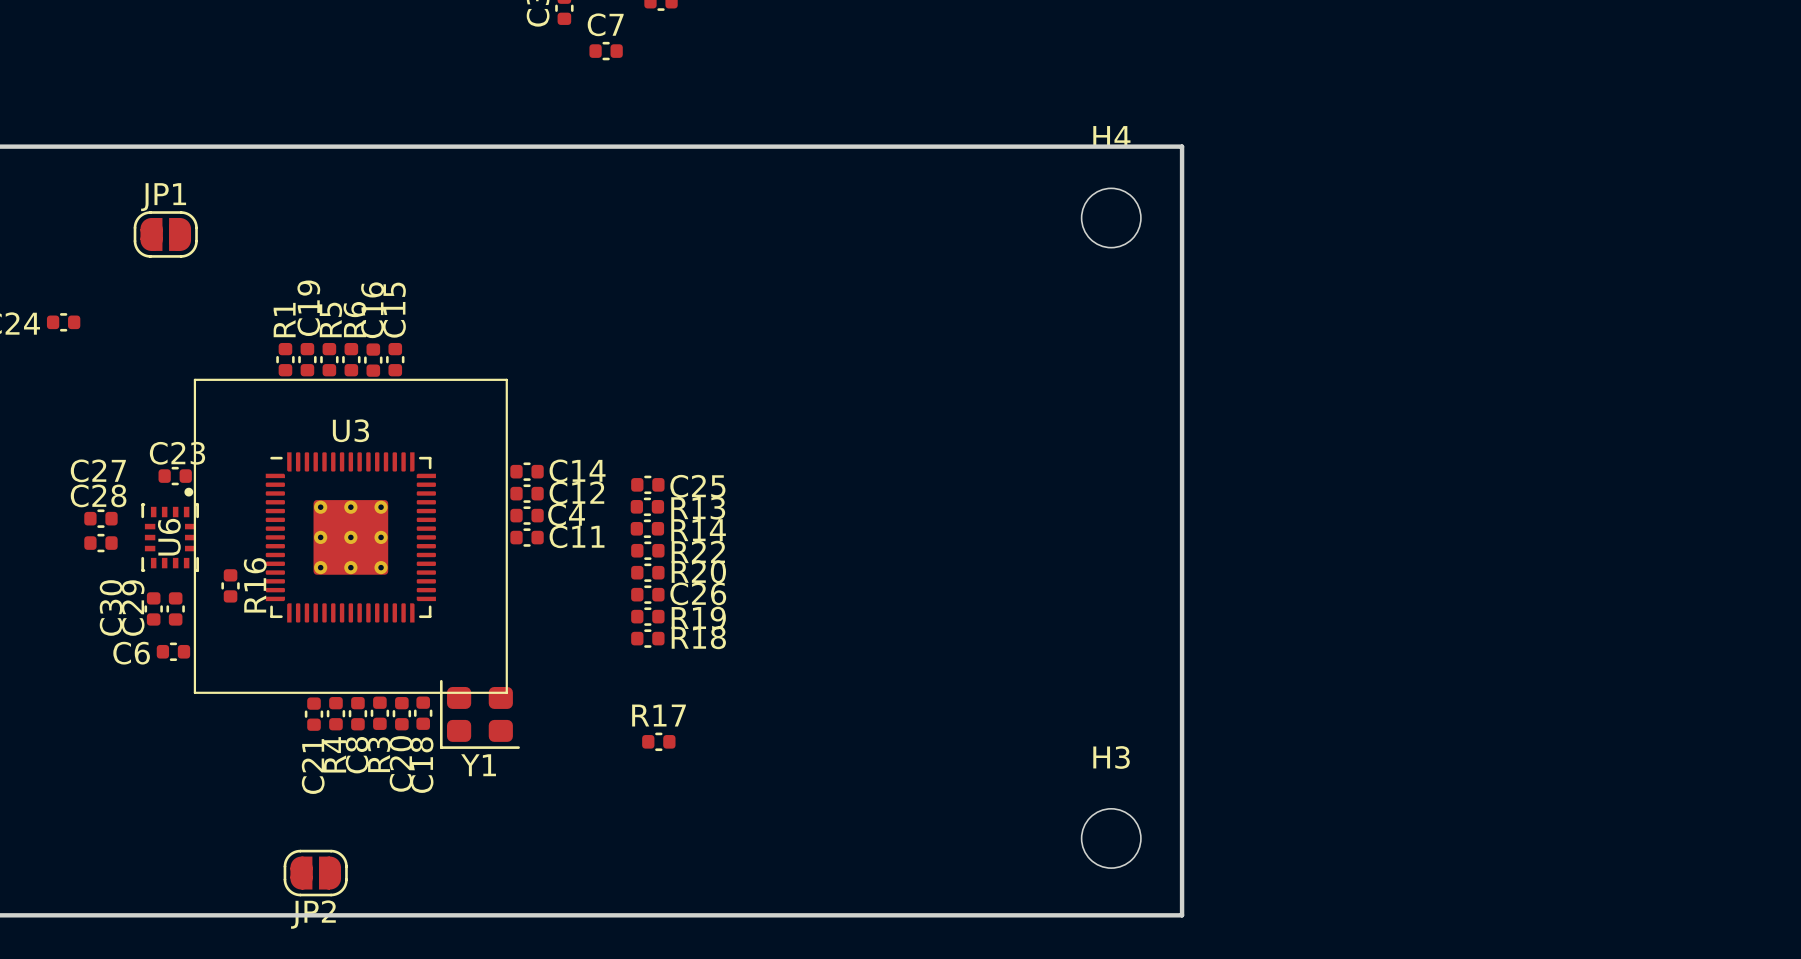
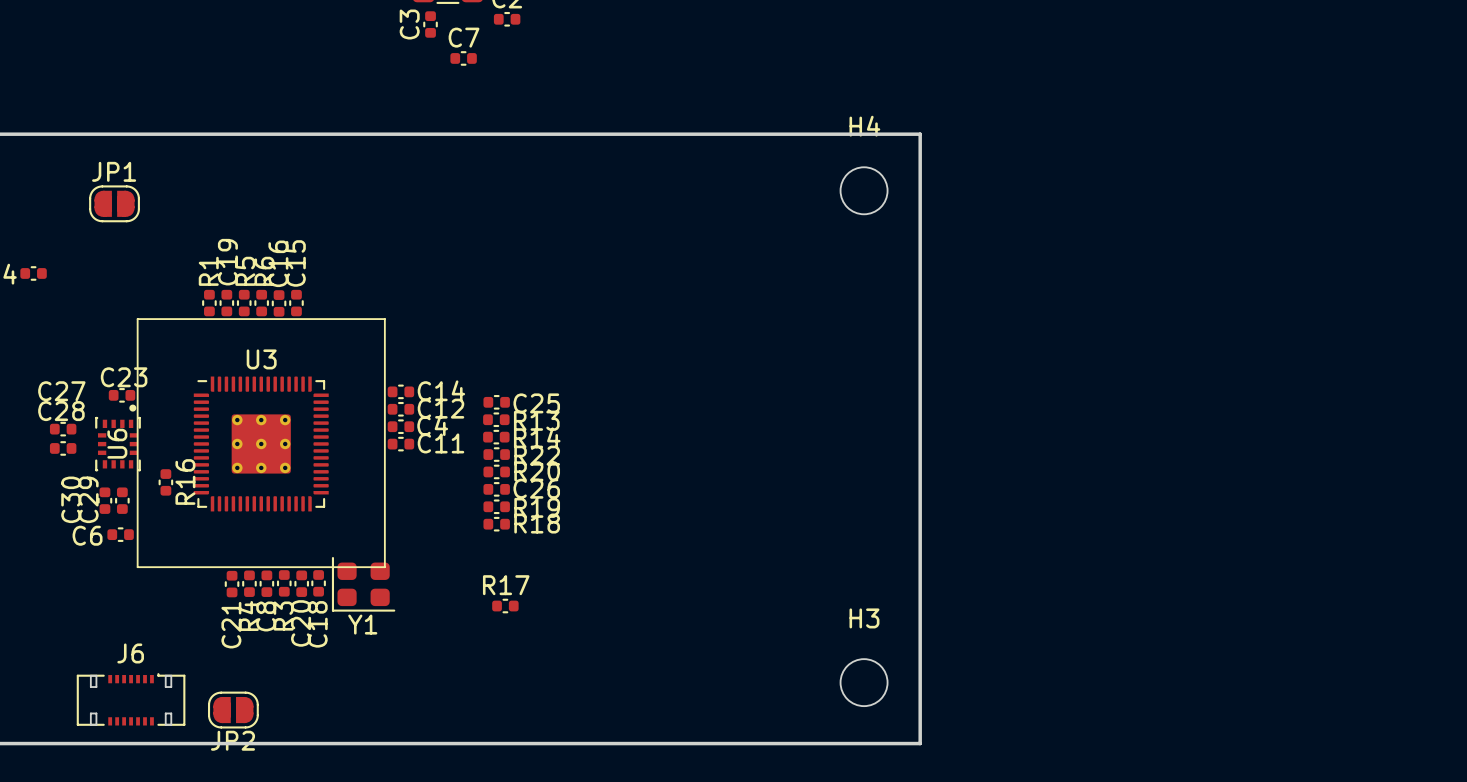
J6: none -> (131, 699)

